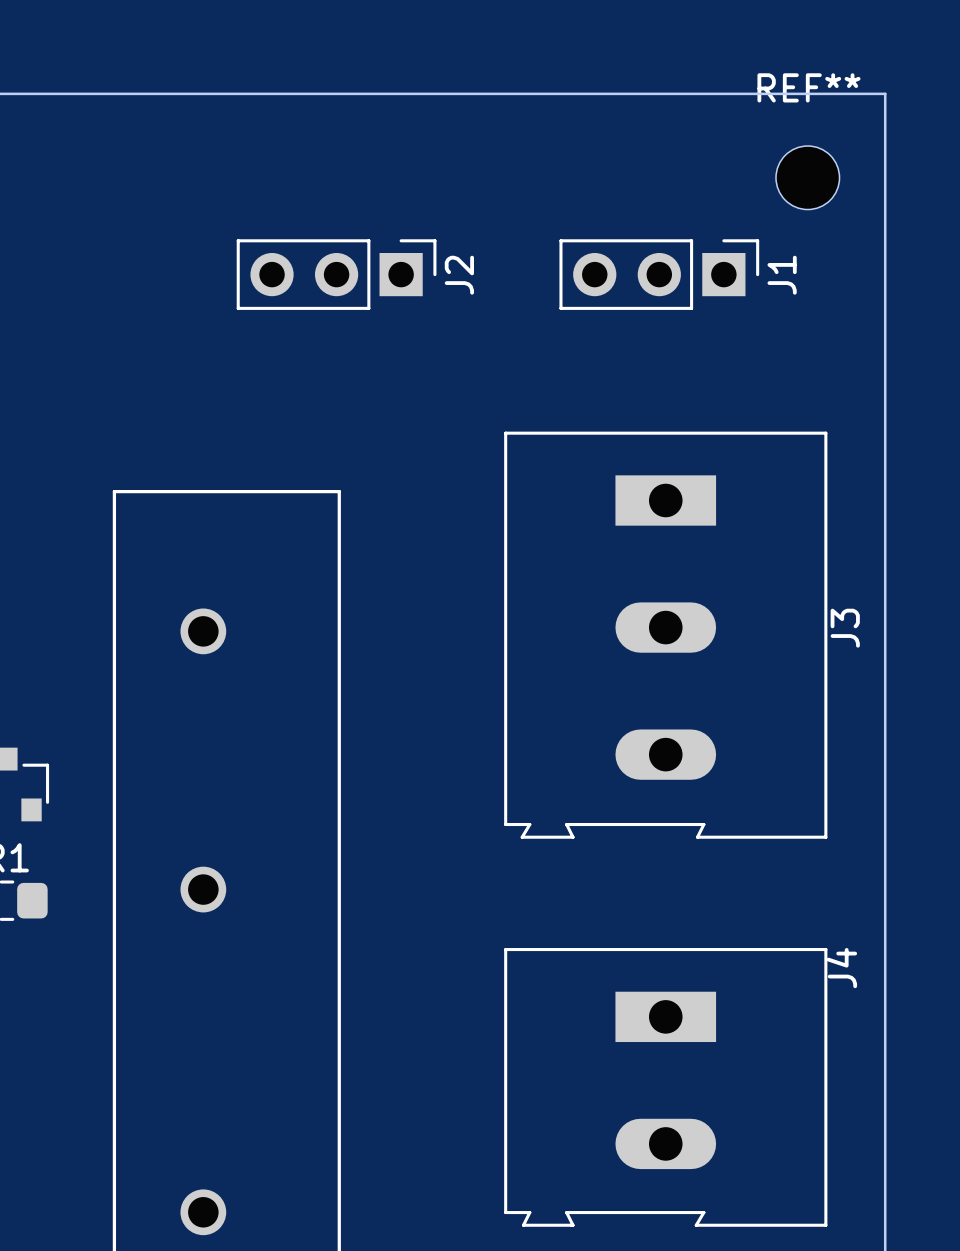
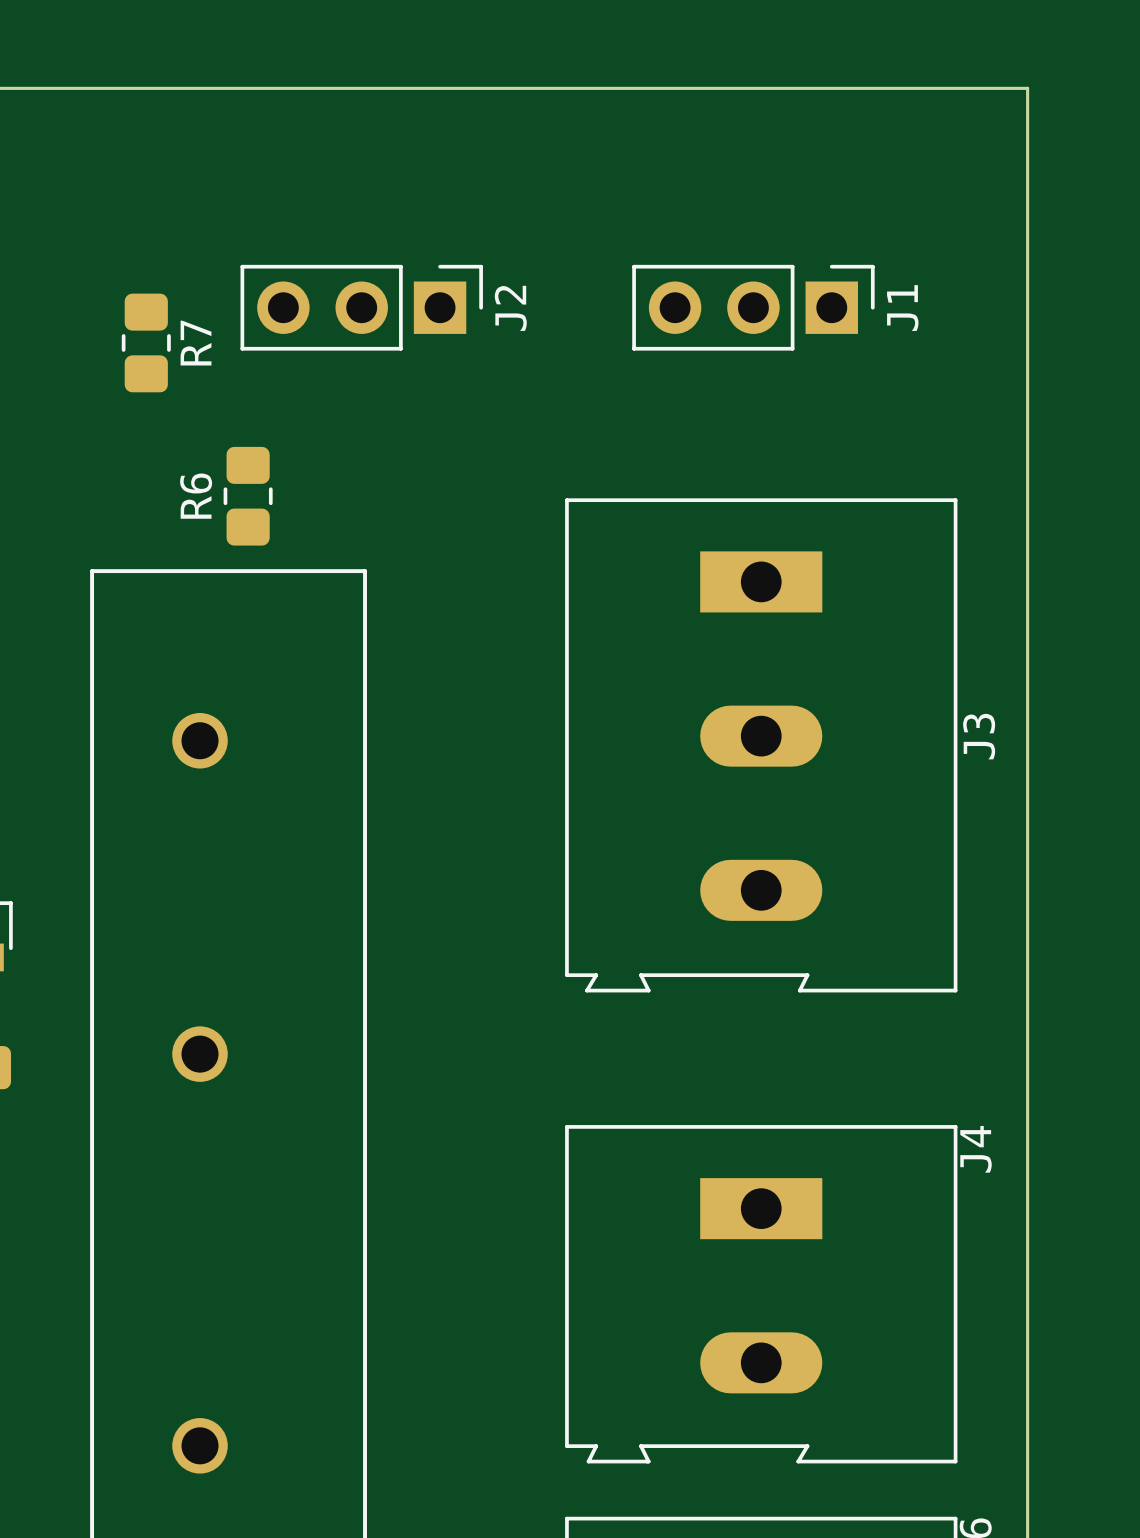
REF**: (807, 177) -> none
R7: none -> (146, 342)
R6: none -> (248, 496)

